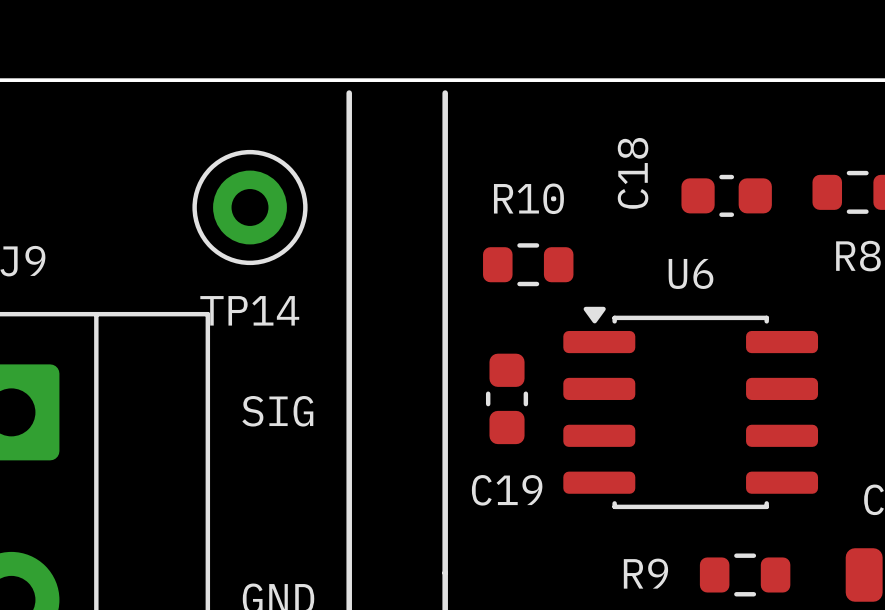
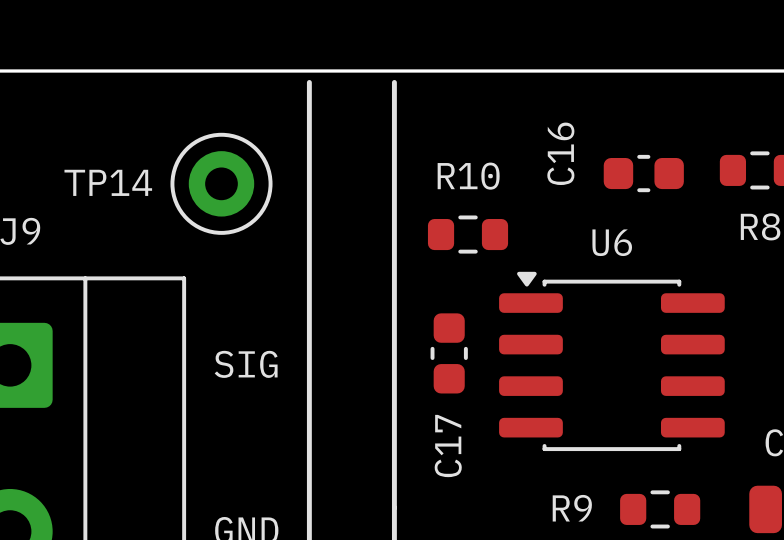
C18 name: C18 (633, 173) -> C16 (560, 153)
TP14 name position: TP14 (249, 310) -> TP14 (108, 182)
C19 name: C19 (507, 490) -> C17 (448, 446)

